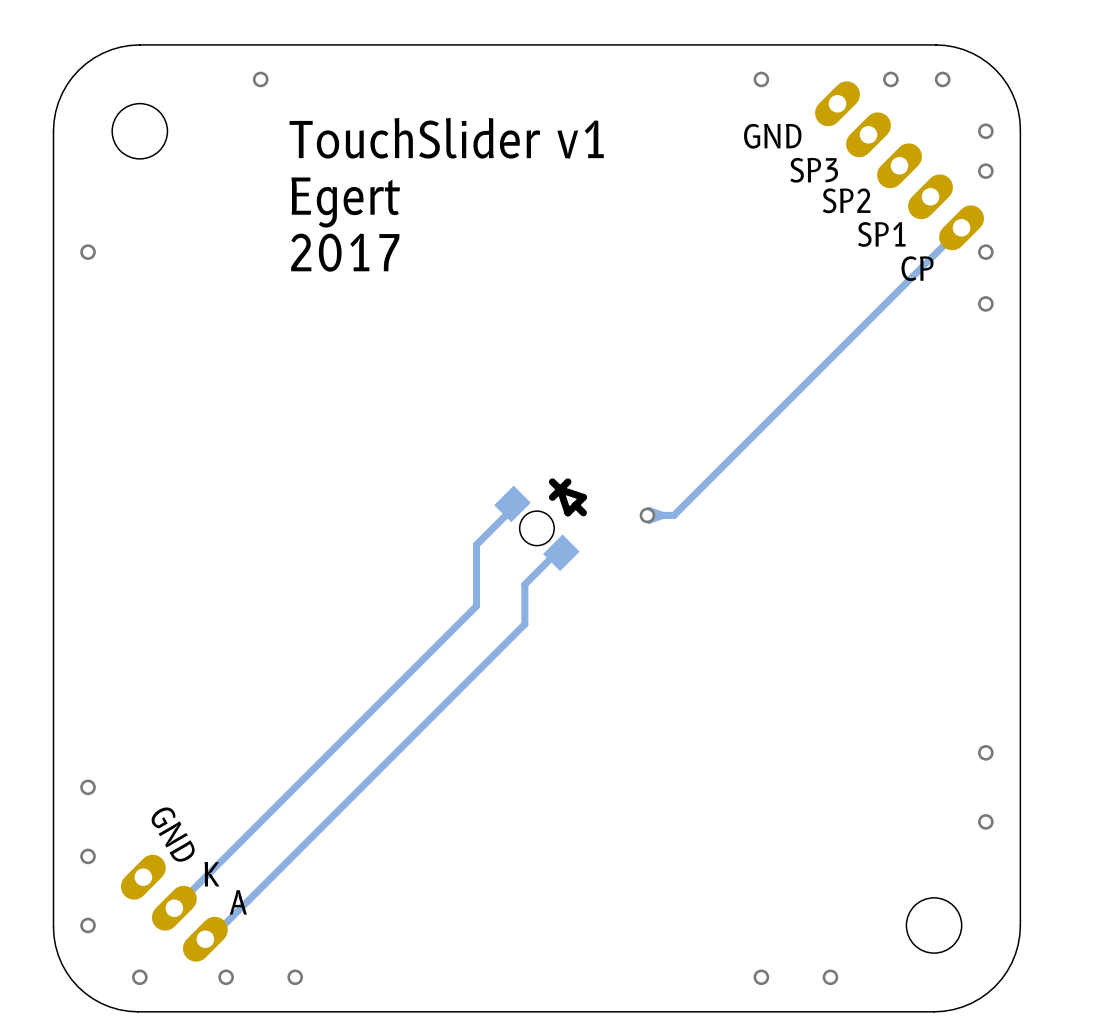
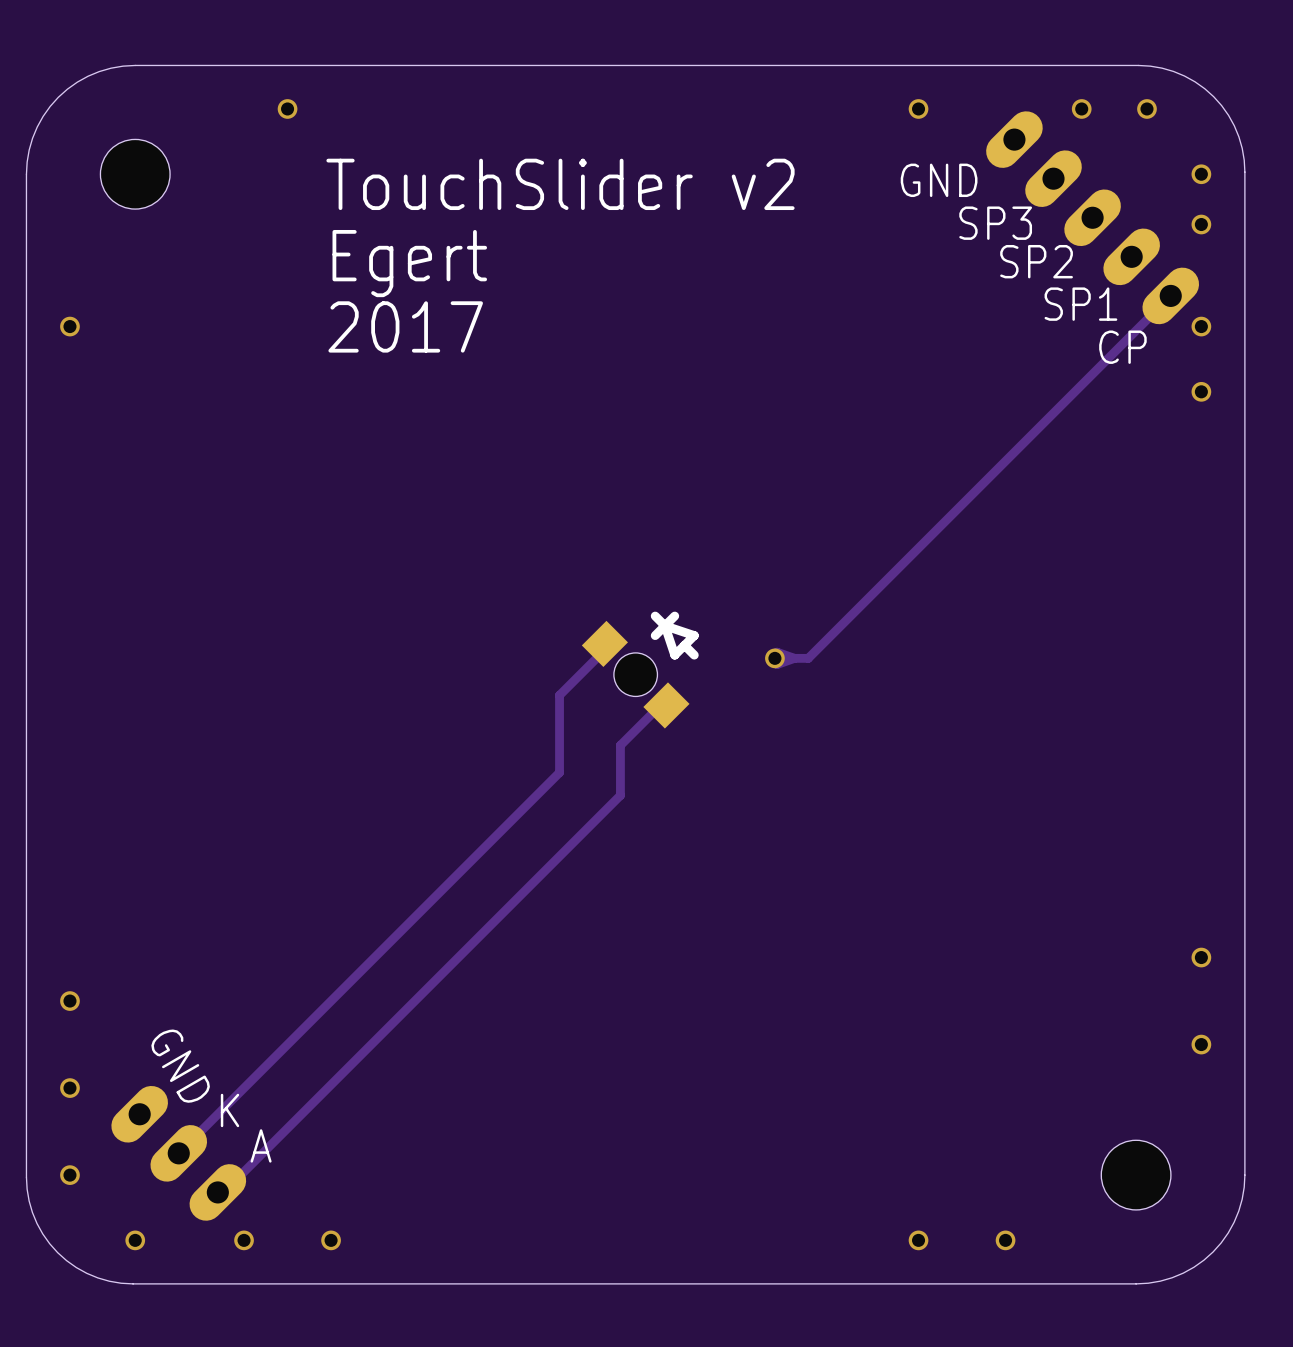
text: TouchSlider v1 (446, 138) -> TouchSlider v2 (560, 184)

